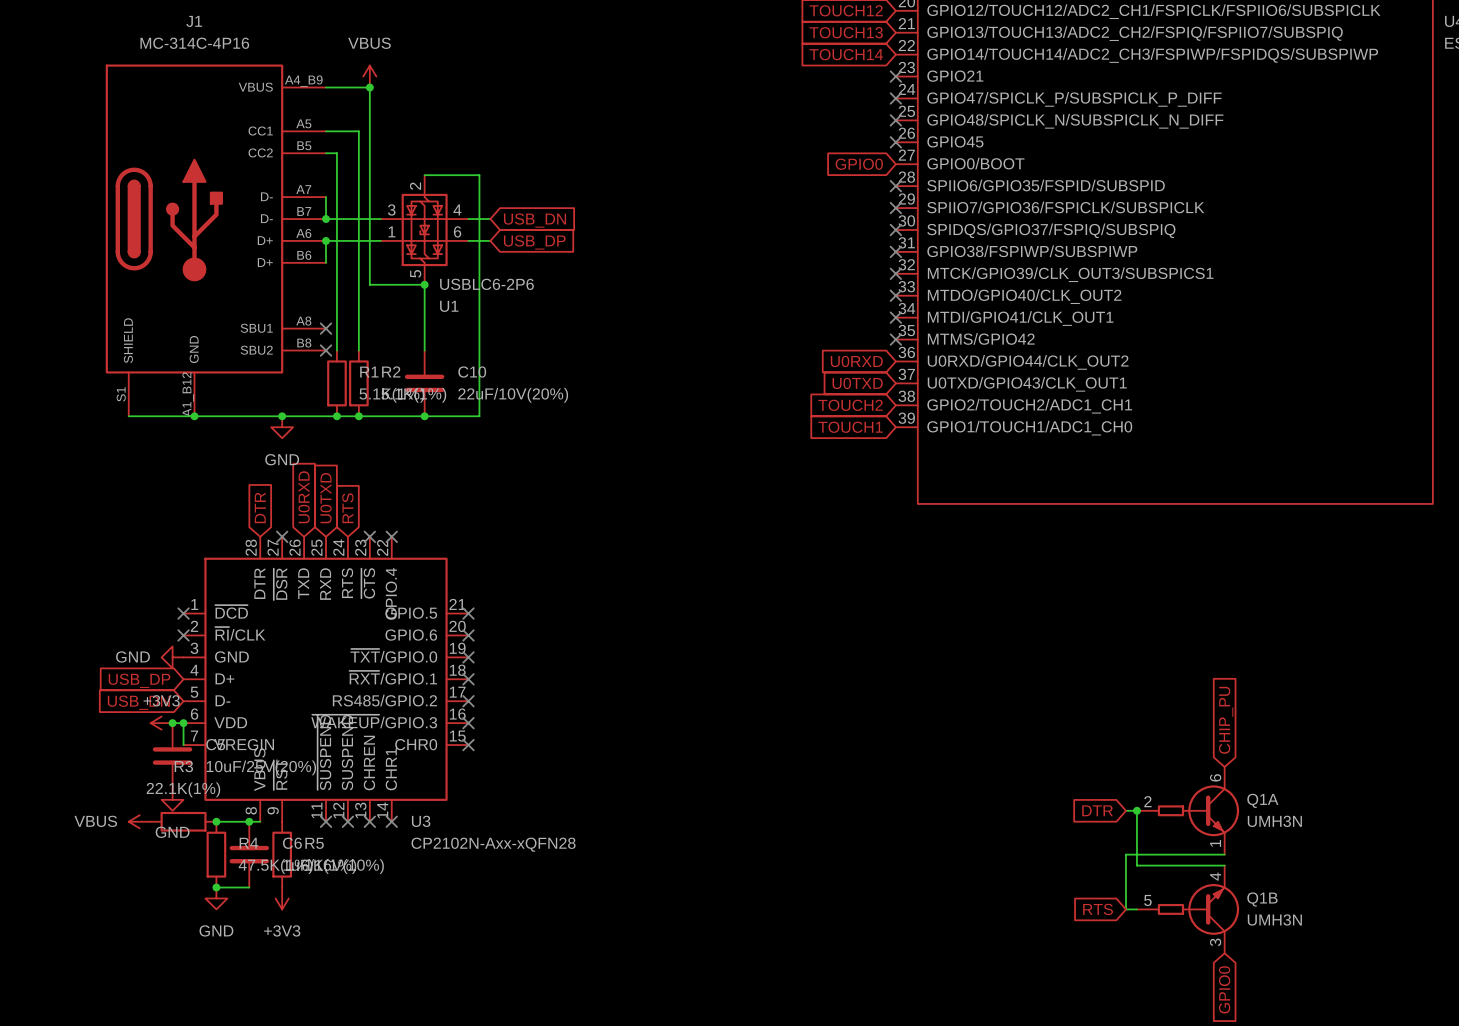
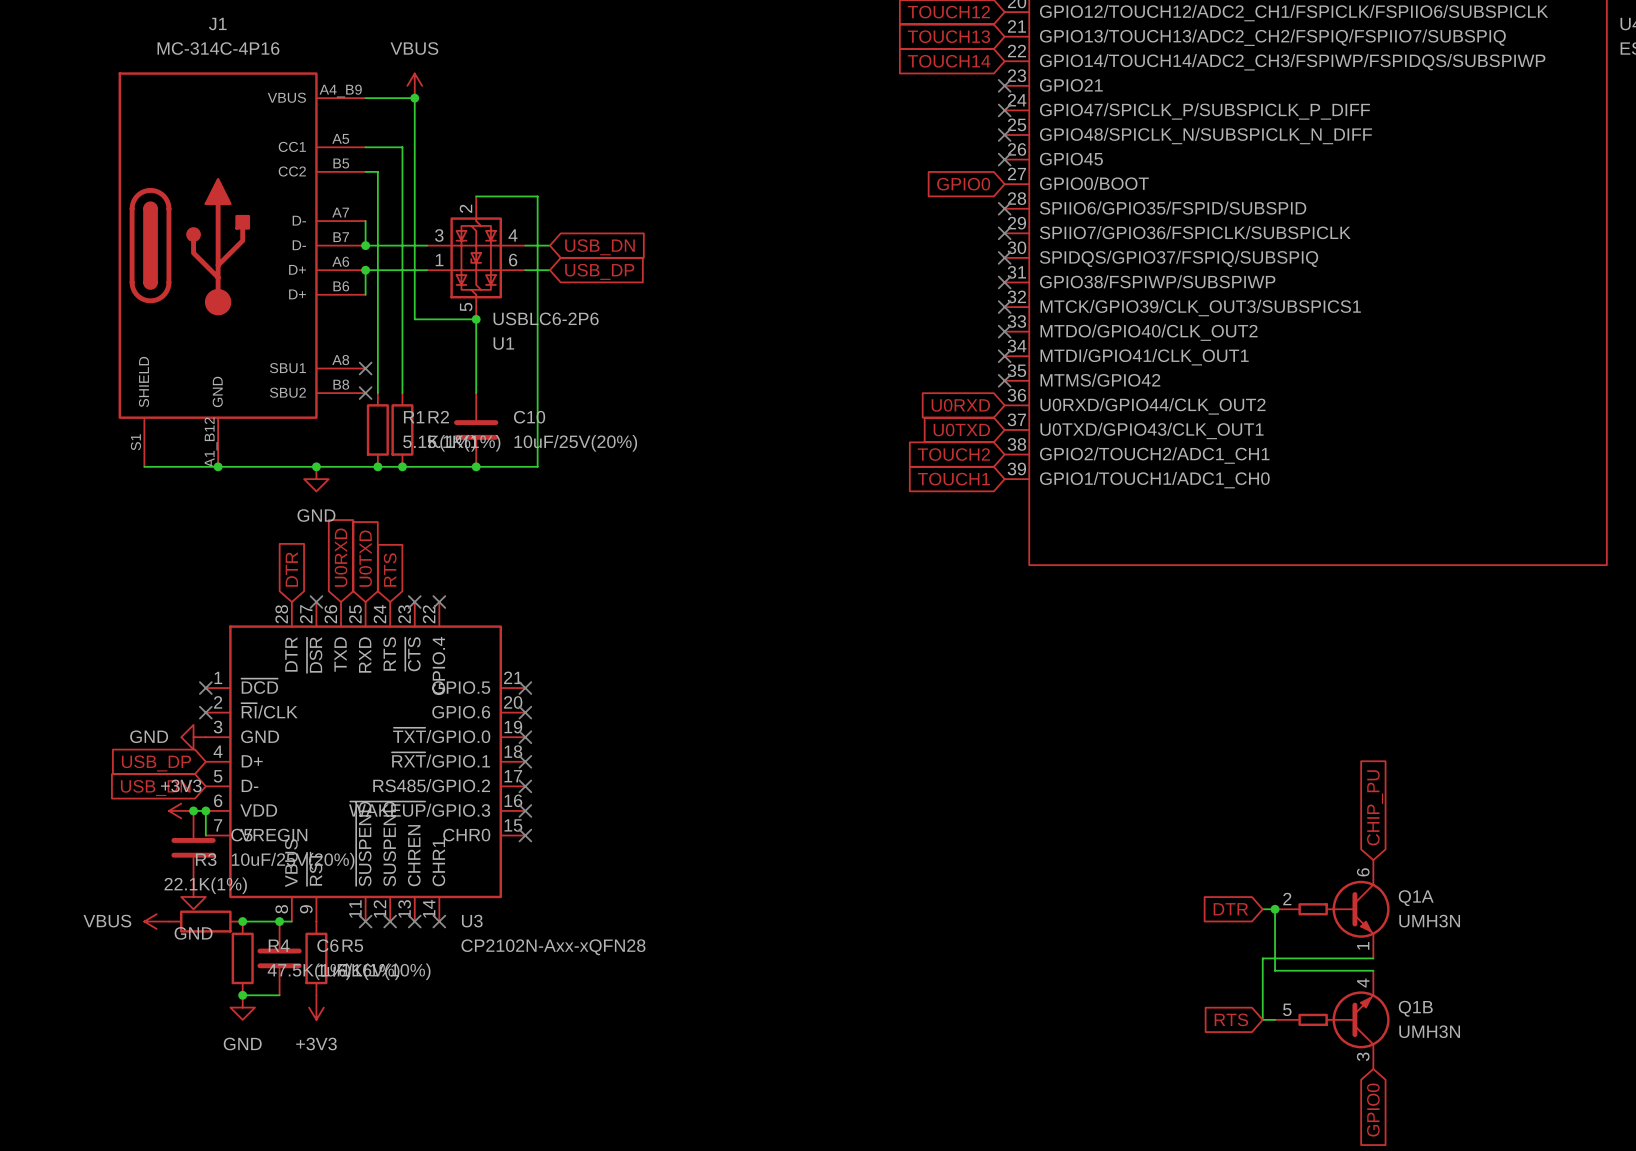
C10 value: 22uF/10V(20%) (513, 395) -> 10uF/25V(20%) (575, 443)

